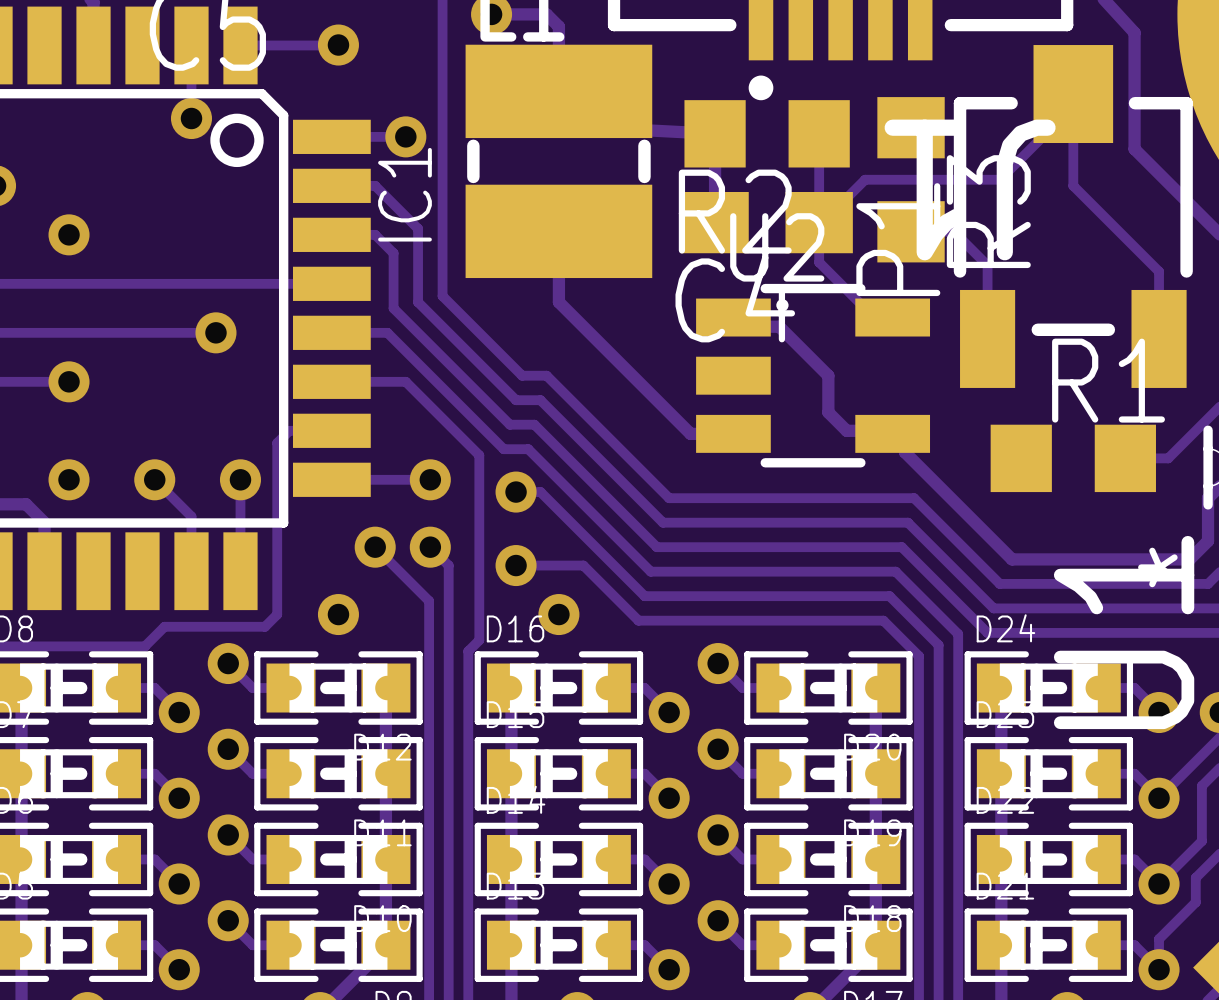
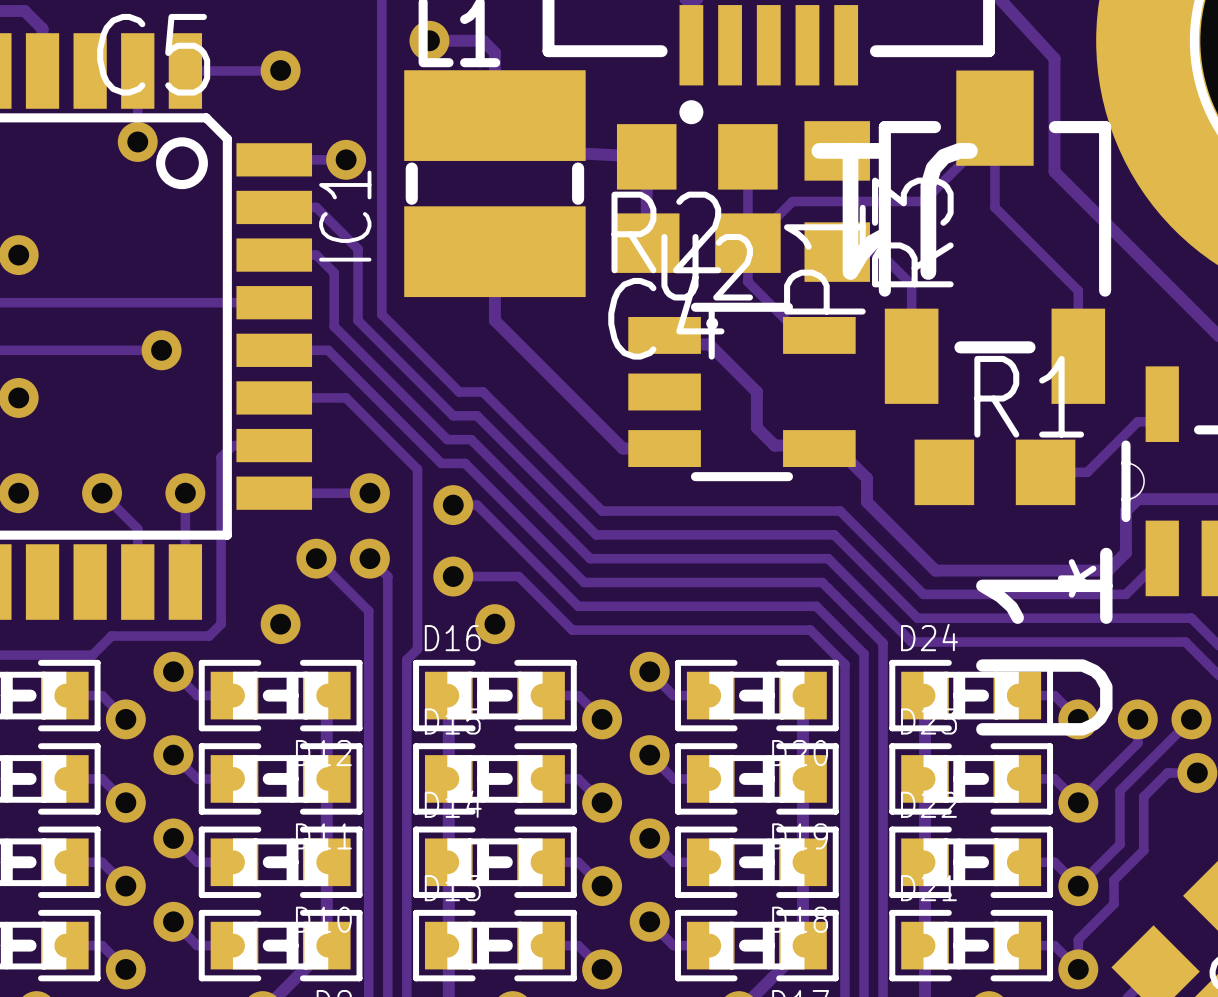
track: (892, 433) (904, 436) (904, 452) (941, 488) -> (819, 448) (840, 451) (866, 478) (866, 502)

